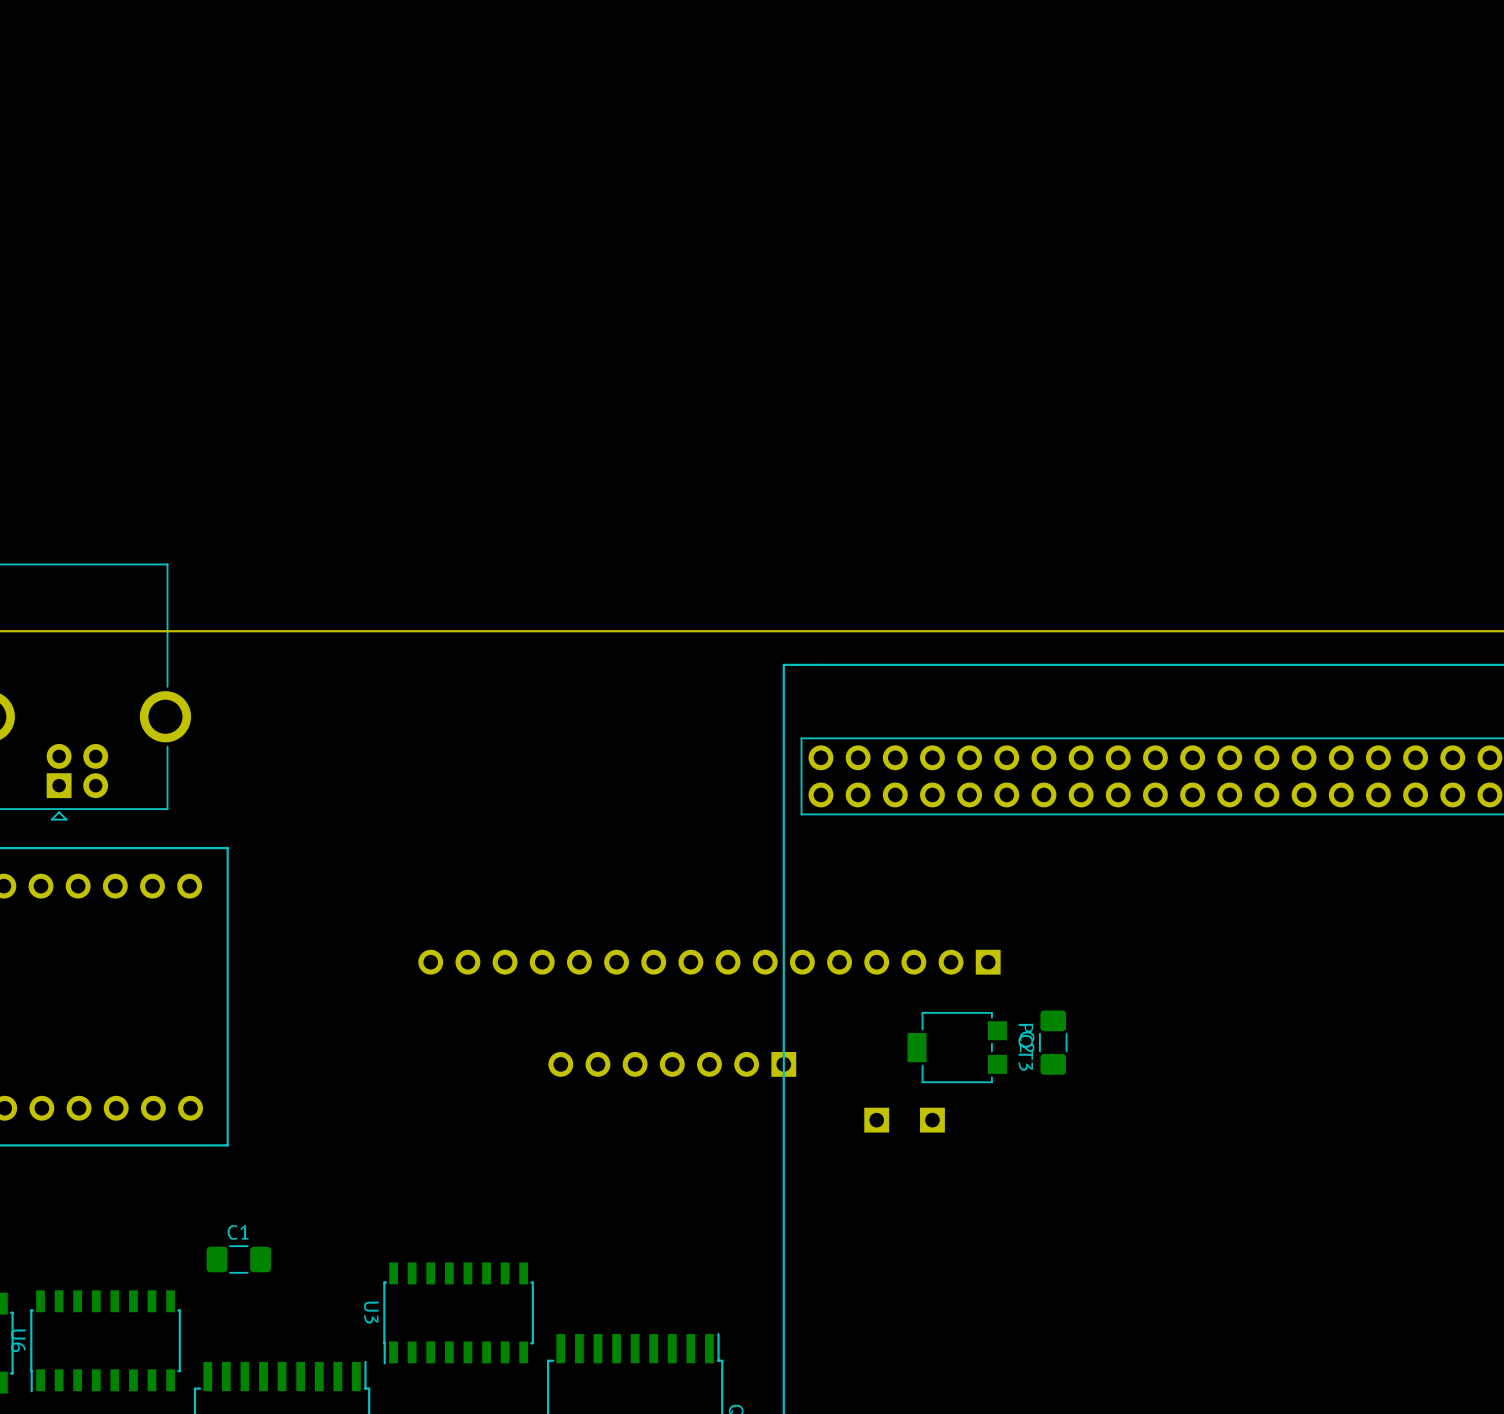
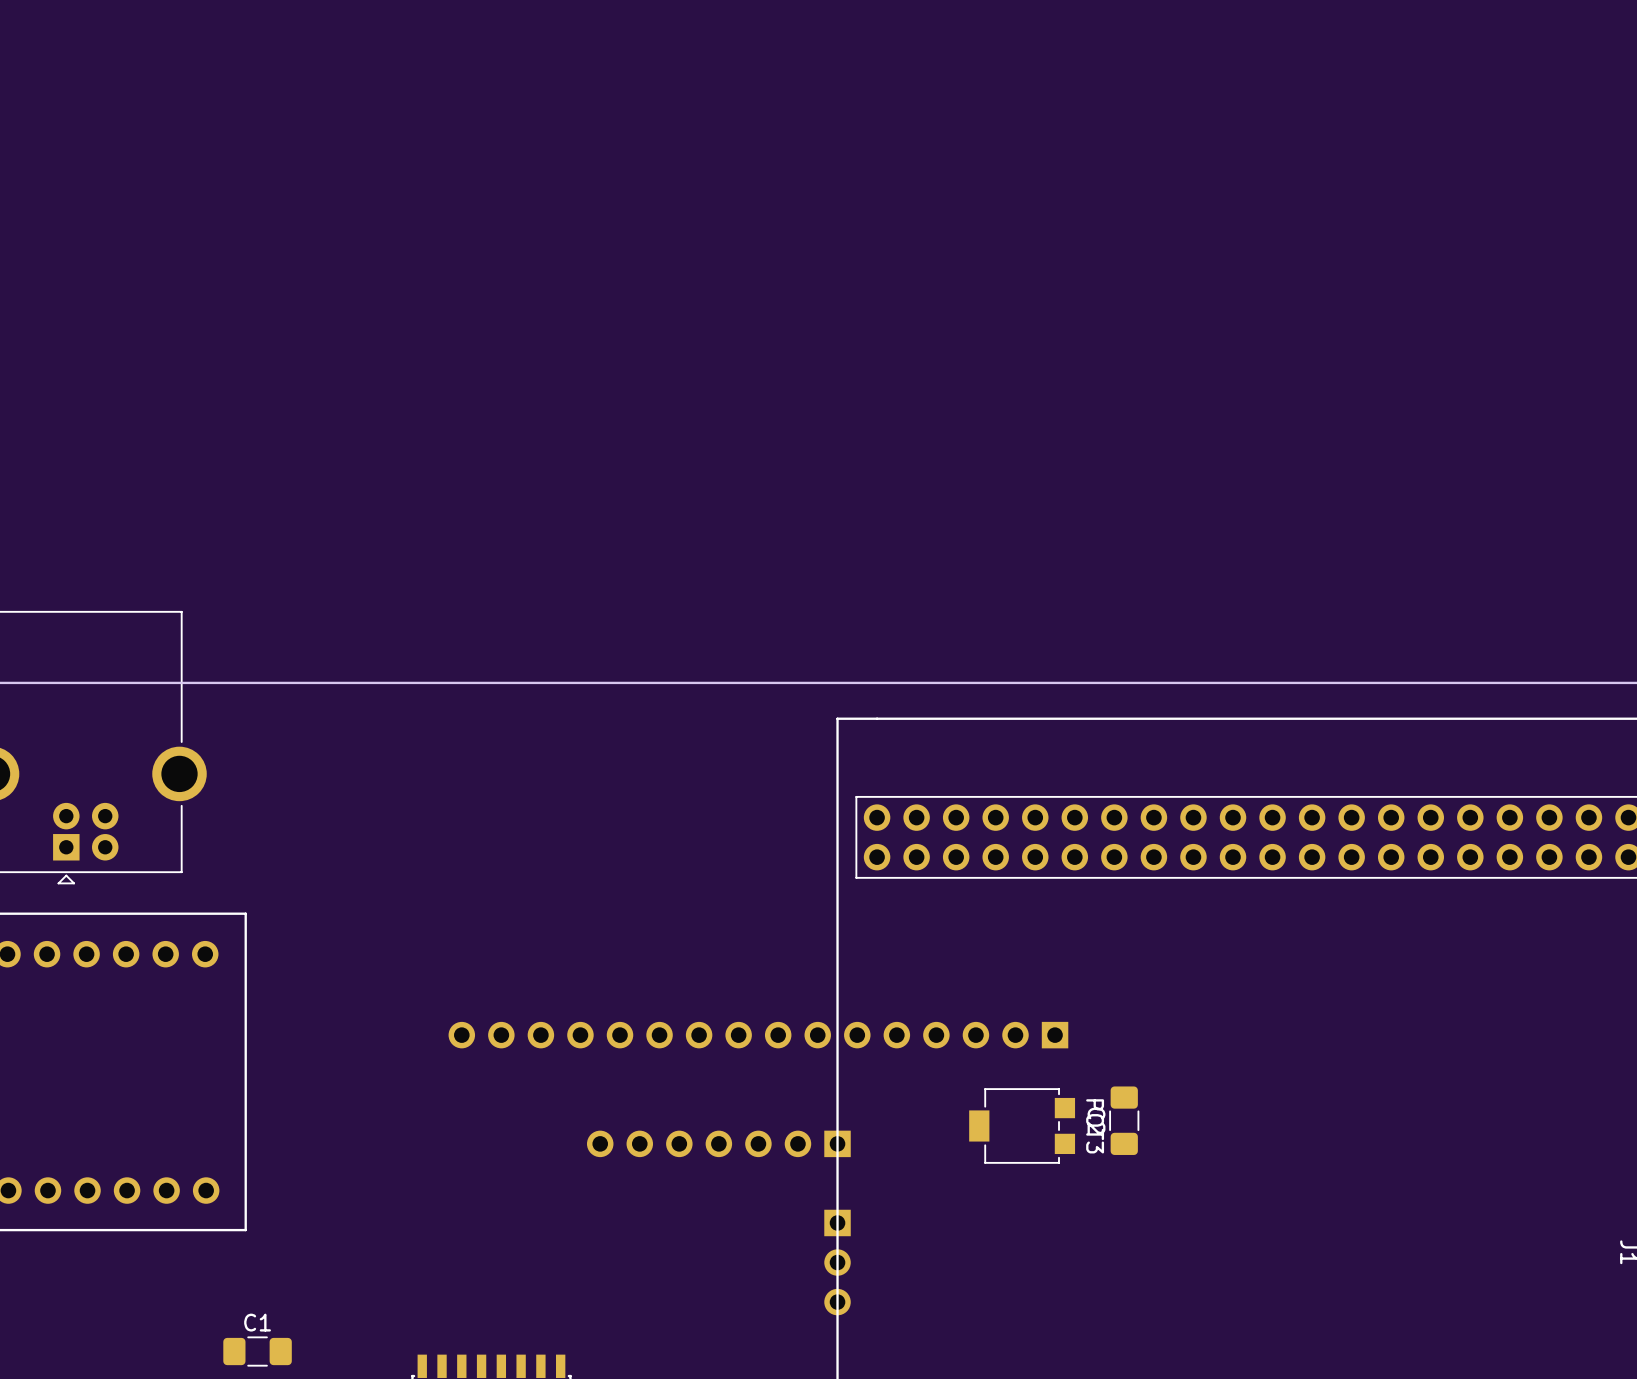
part: (876, 1120) -> none
part: (932, 1120) -> none
part: none -> (837, 1262)

